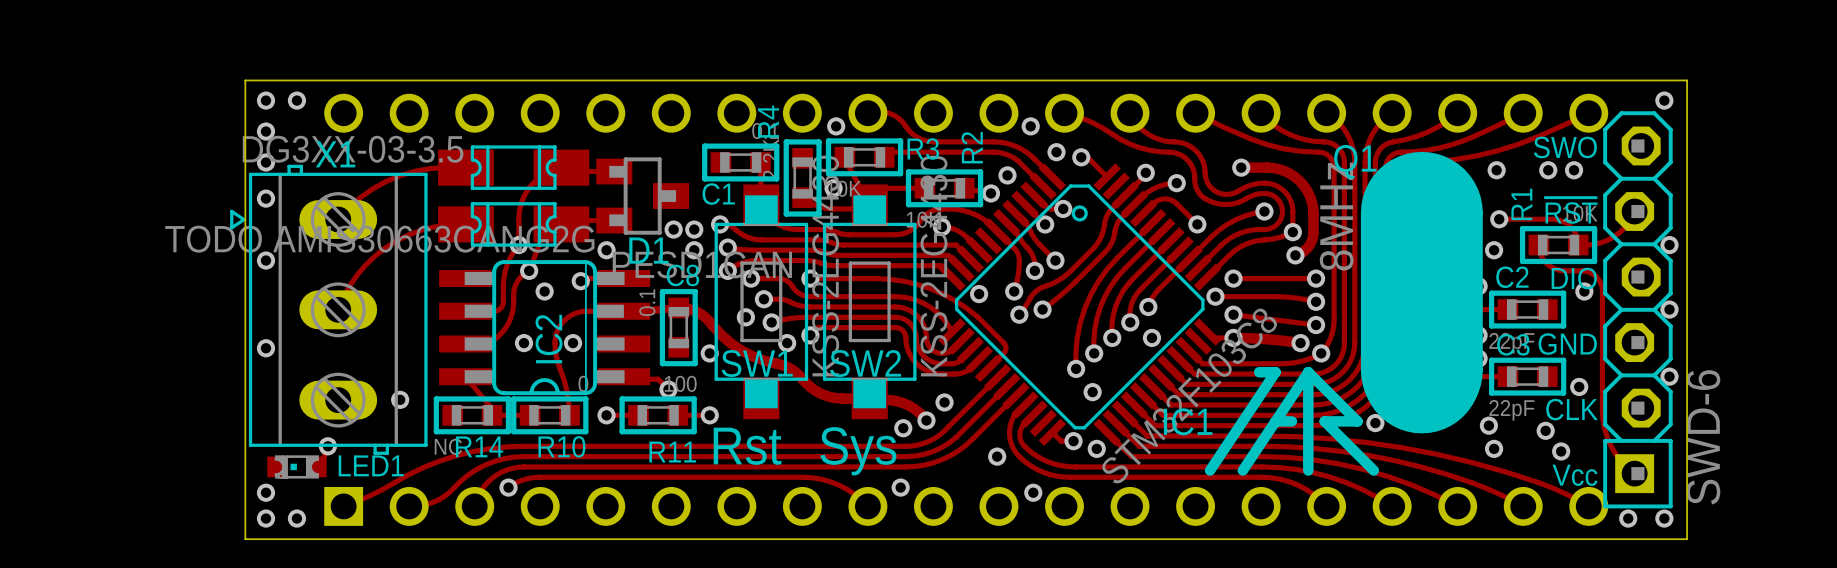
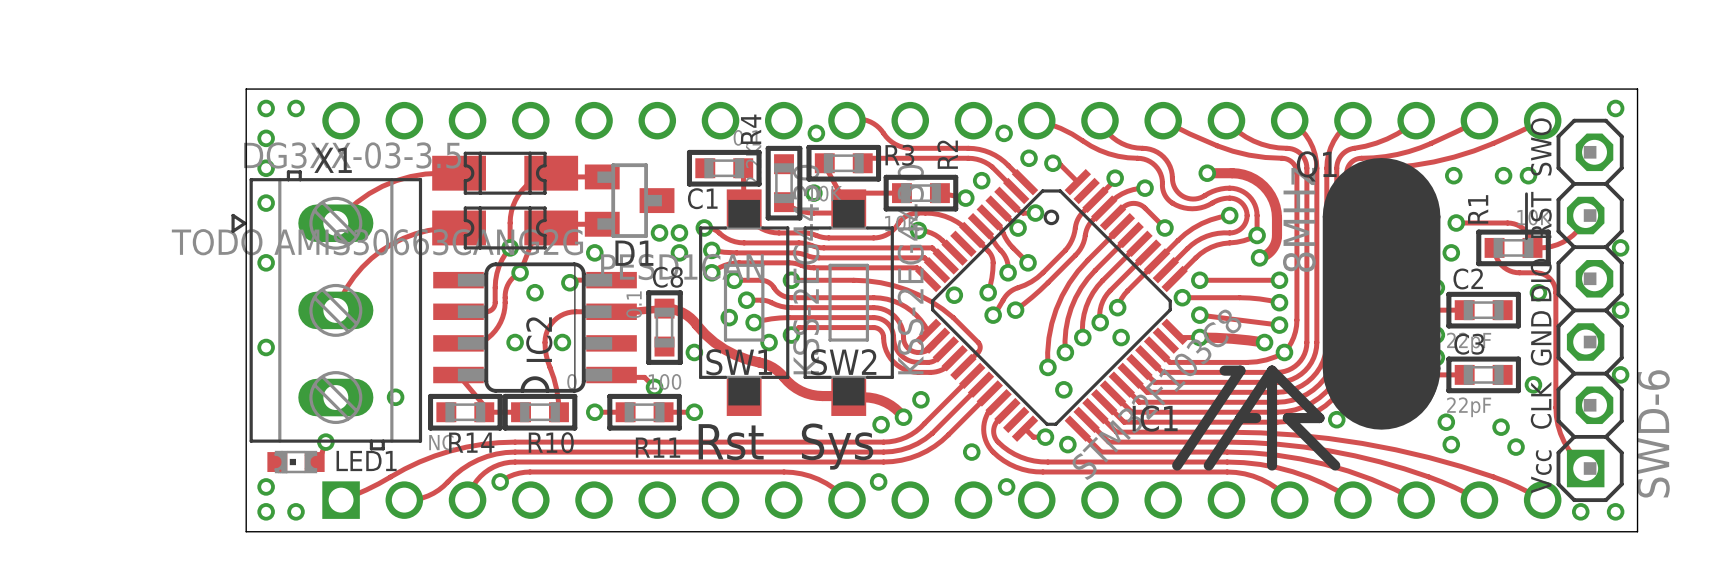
part footprint: [1603, 111, 1673, 509] -> [1556, 118, 1624, 503]

